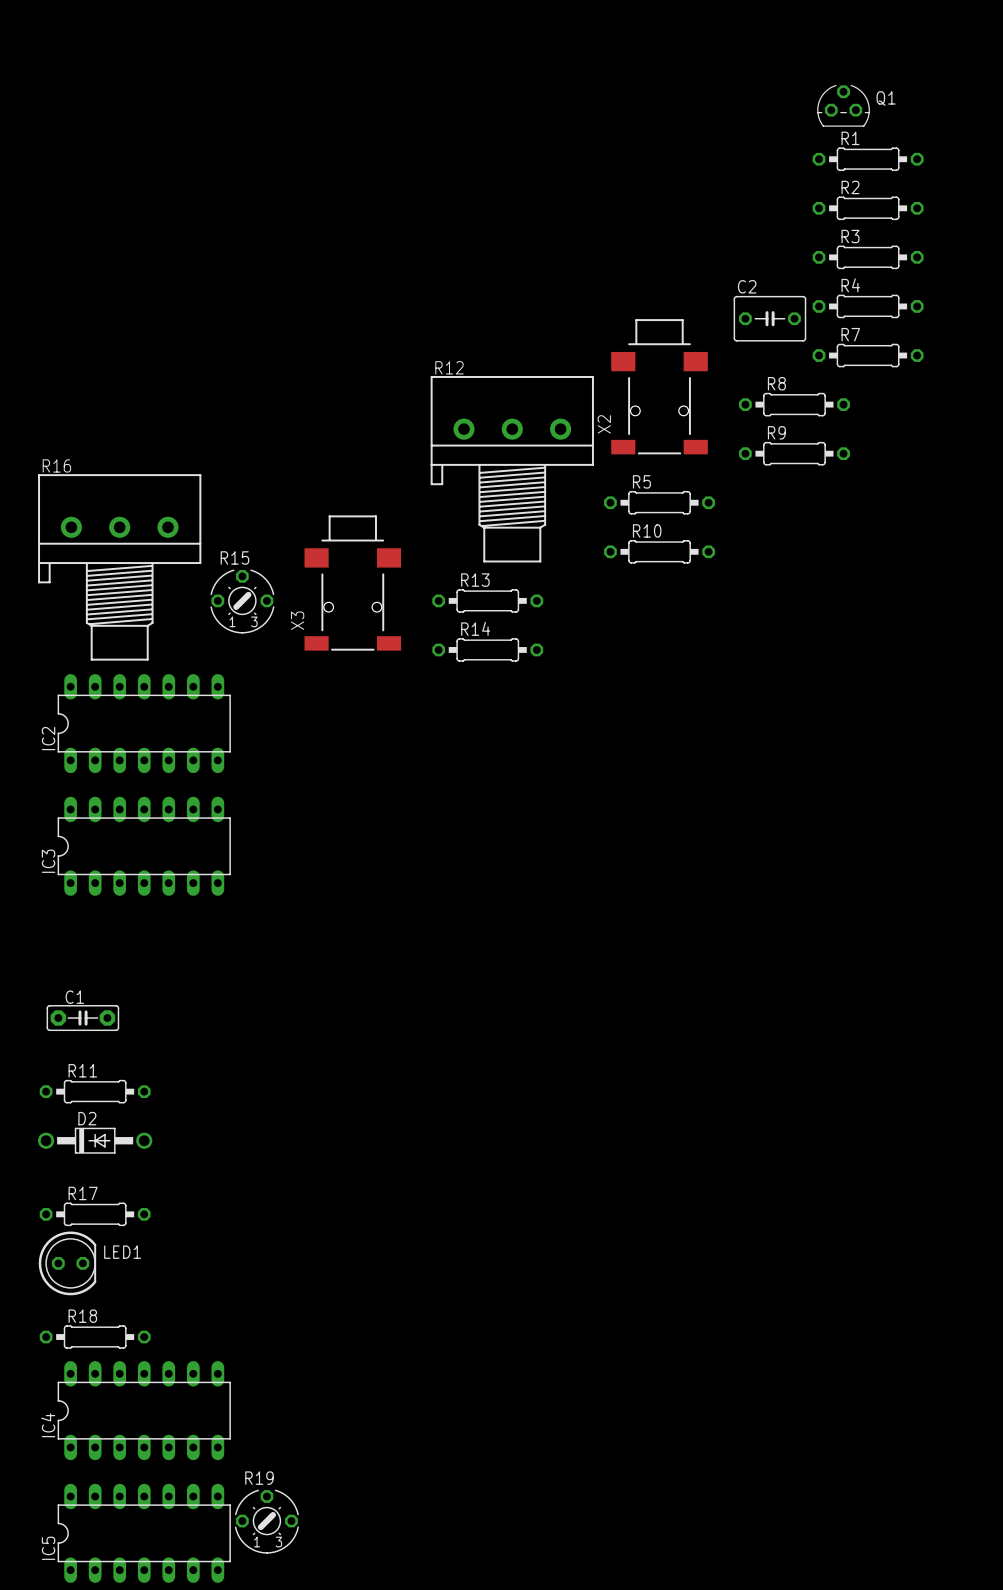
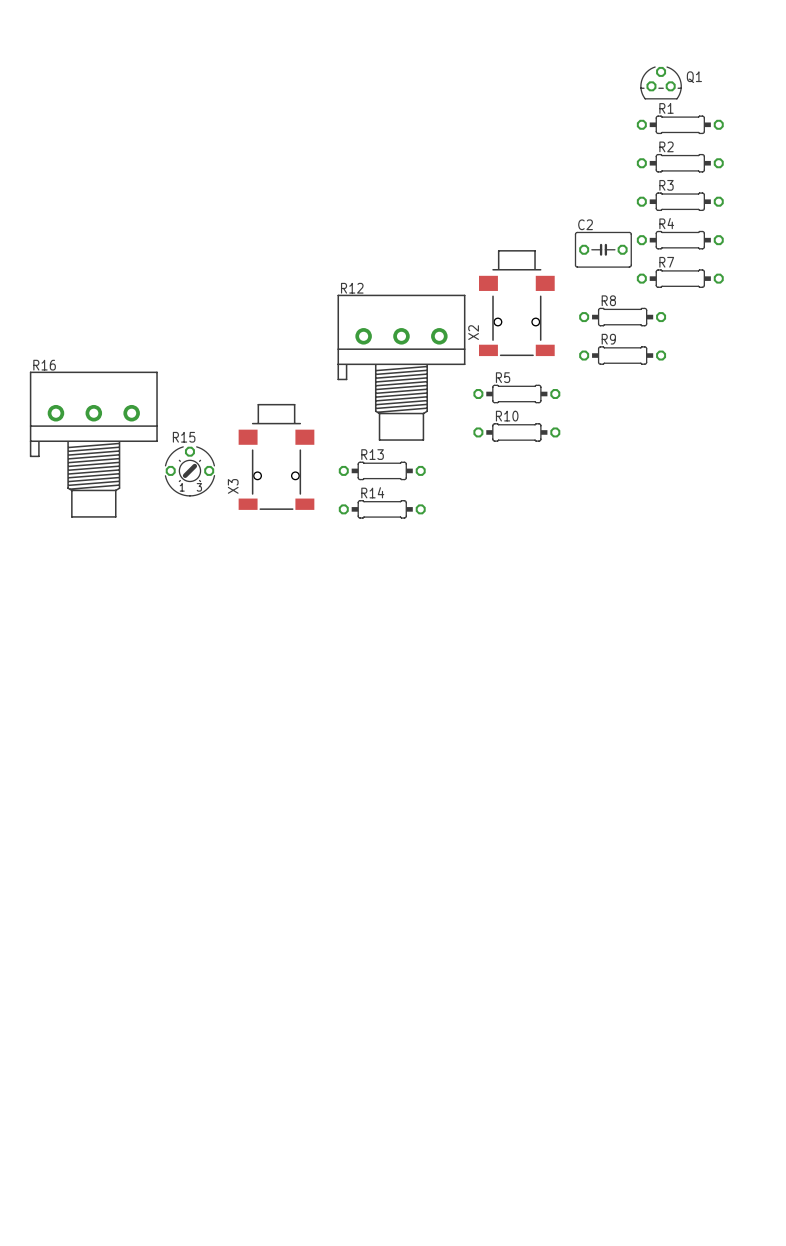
IC2: (144, 723) -> none
IC3: (144, 846) -> none
C1: (82, 1018) -> none
R11: (95, 1091) -> none
D2: (95, 1140) -> none
R17: (95, 1214) -> none
LED1: (67, 1263) -> none
R18: (95, 1337) -> none
IC4: (144, 1410) -> none
R19: (266, 1521) -> none
IC5: (144, 1533) -> none

